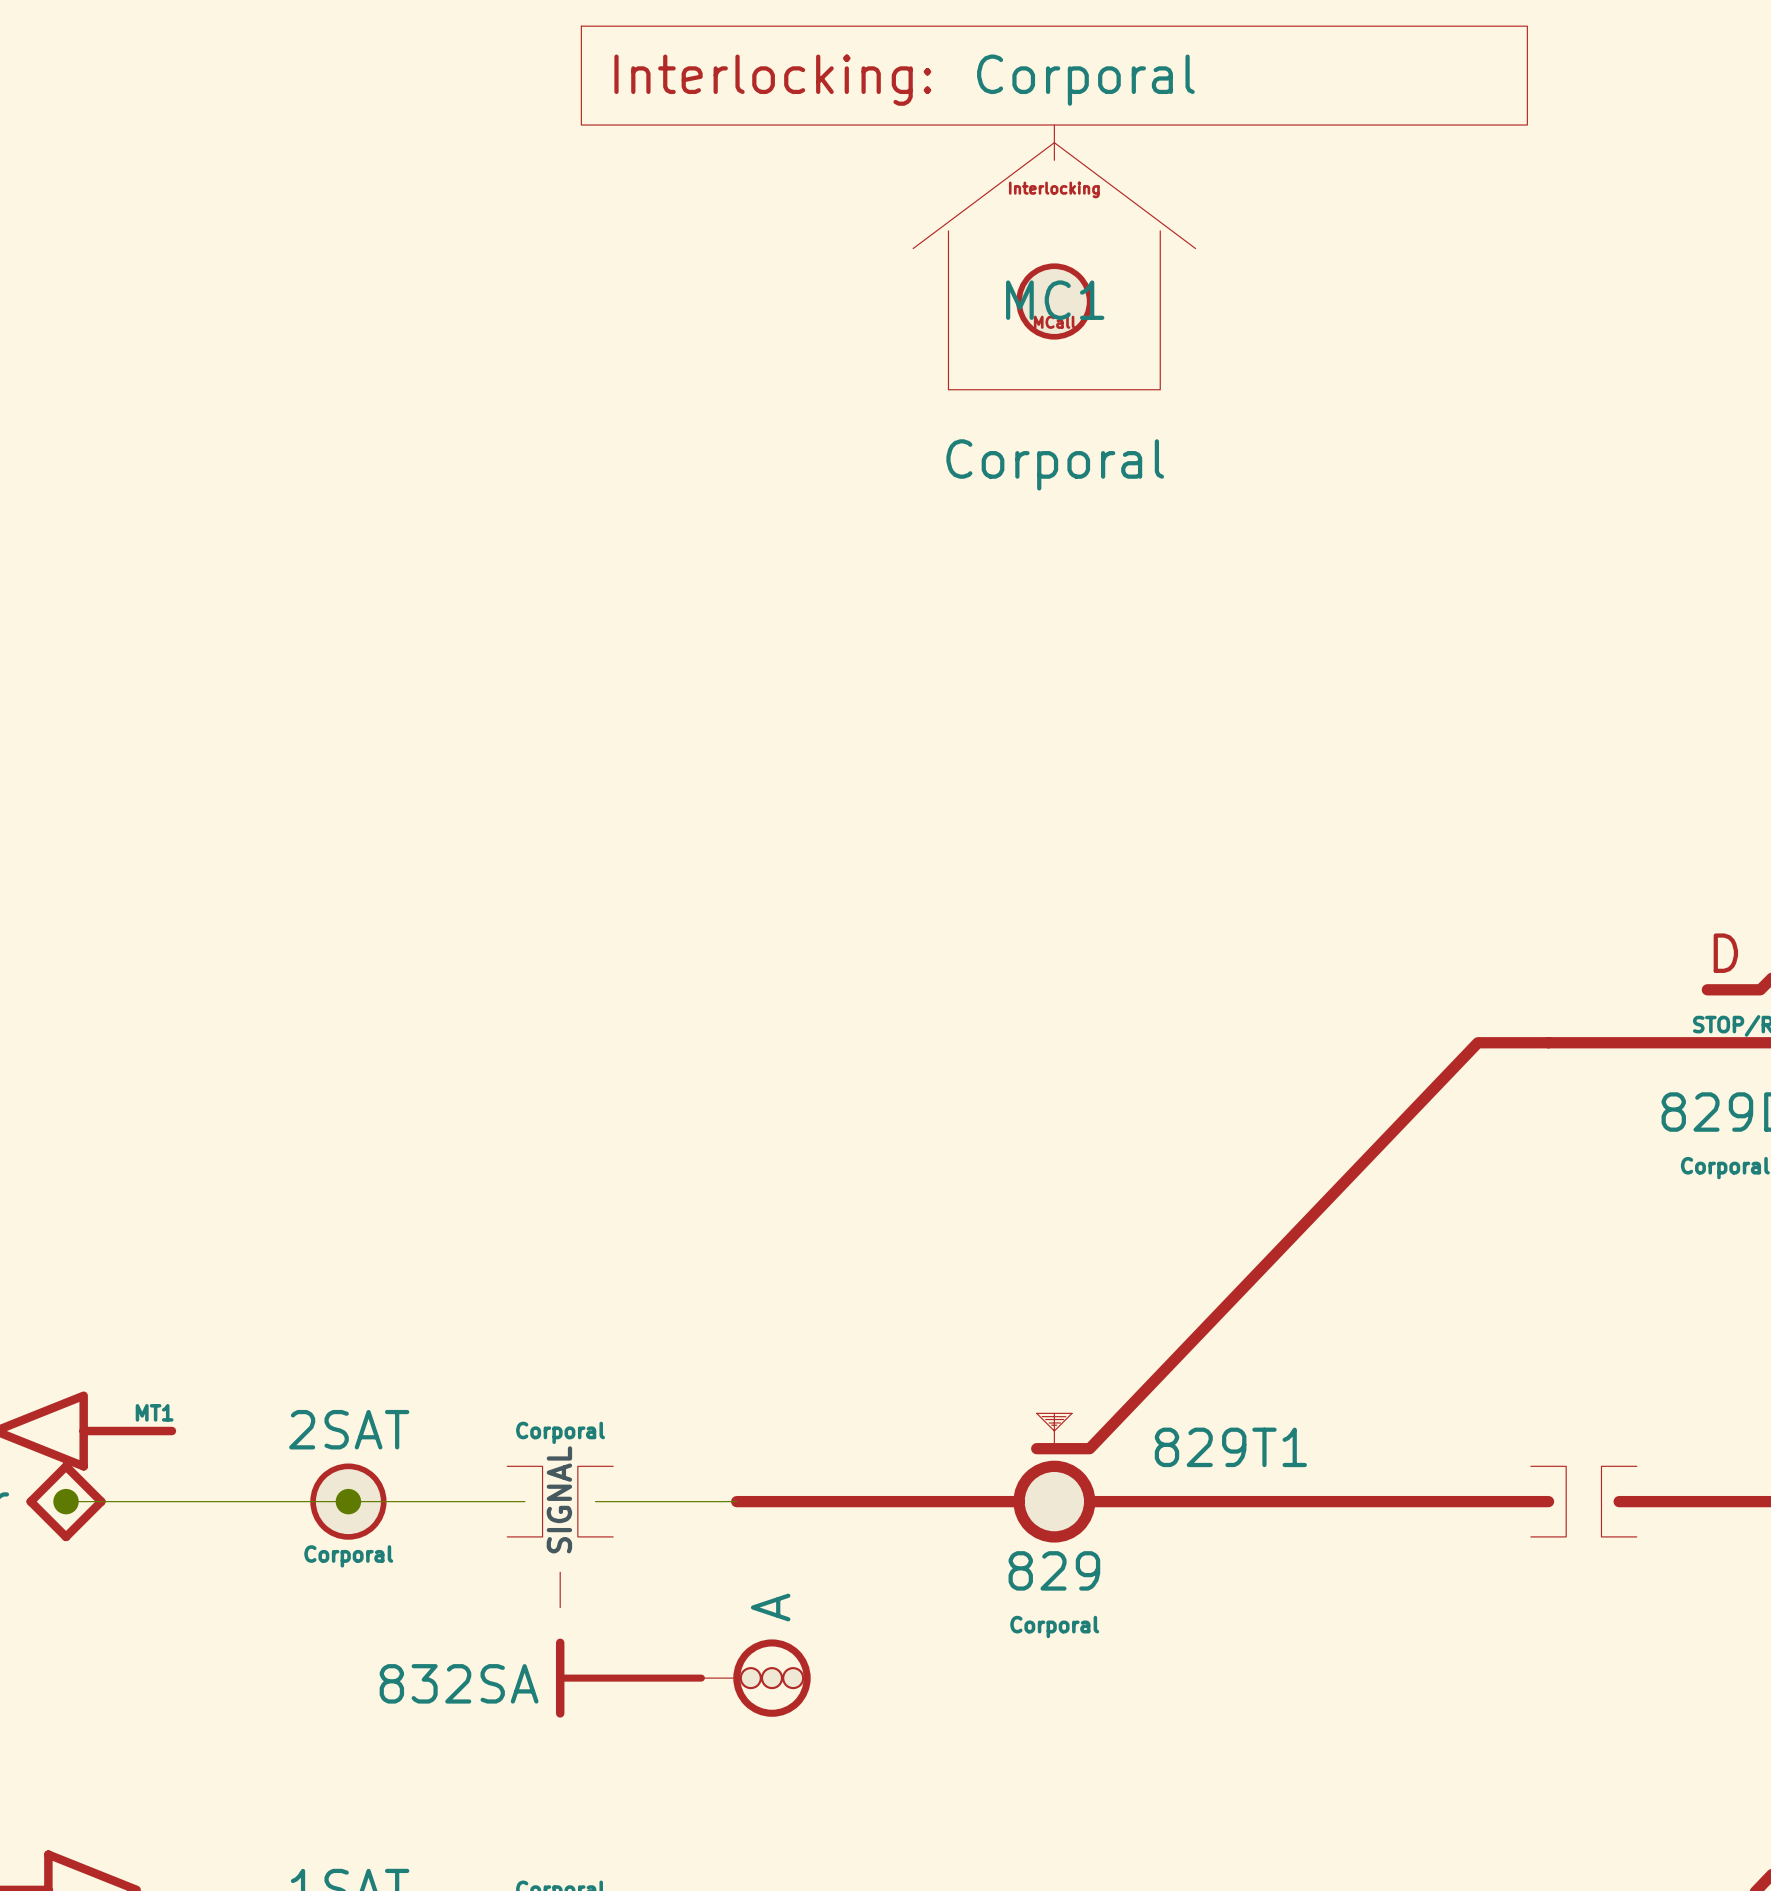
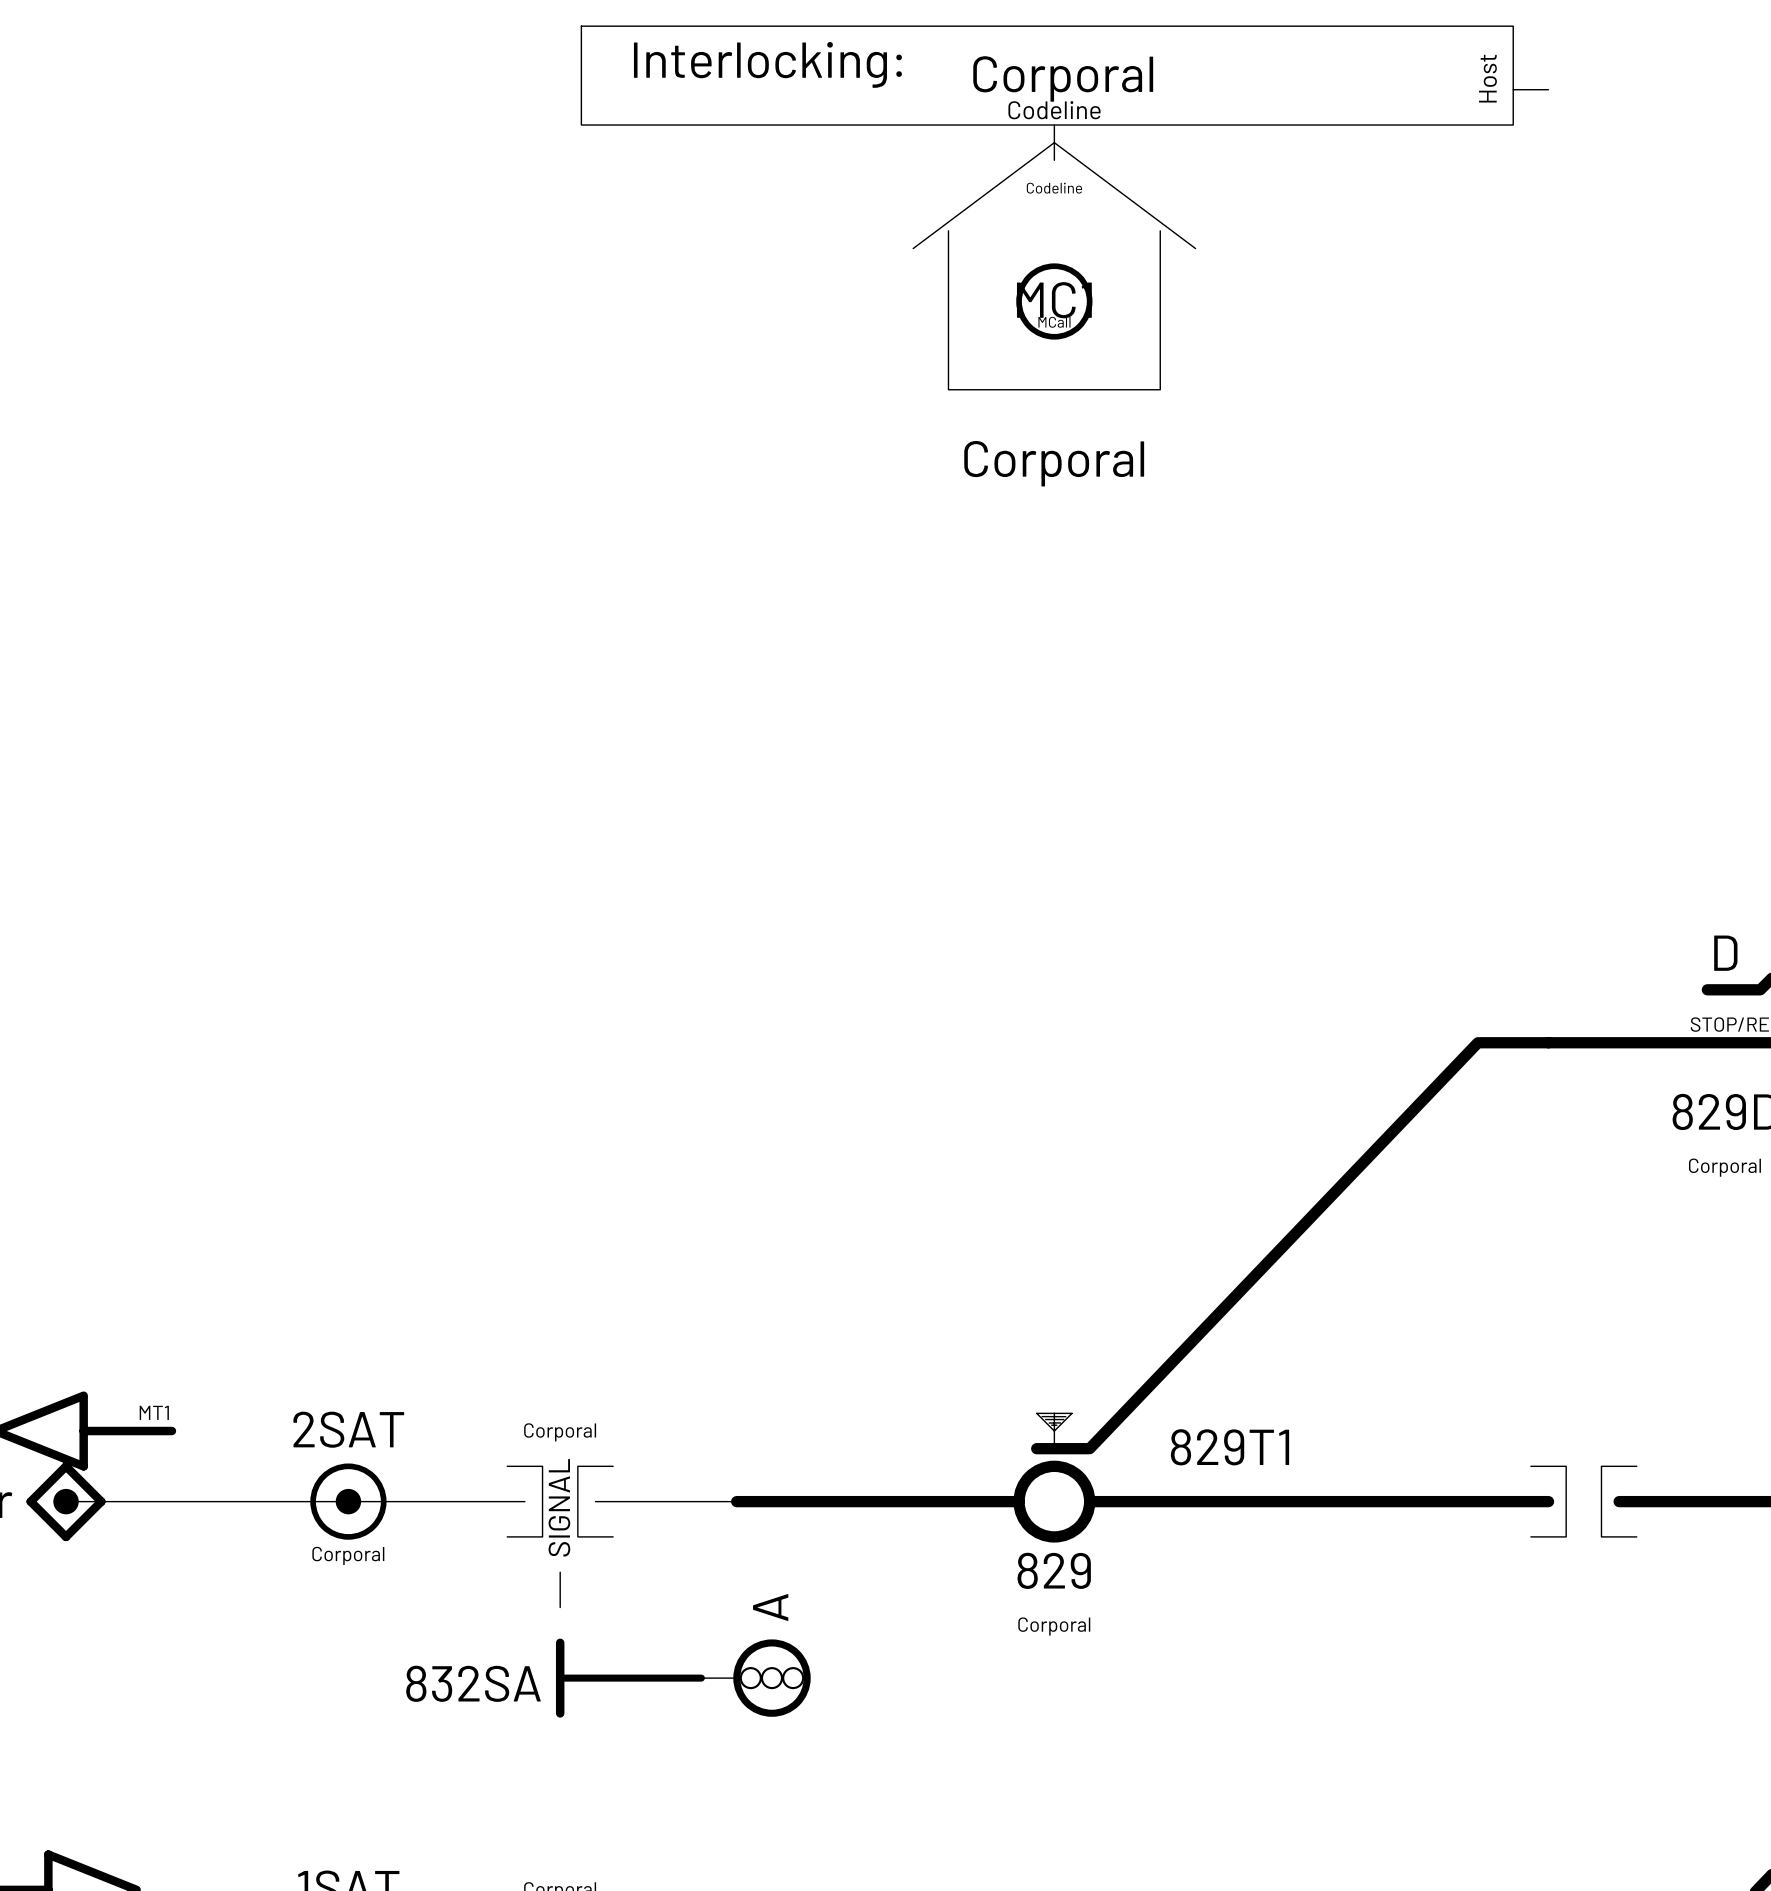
part symbol: [581, 26, 1528, 161] -> [581, 26, 1549, 161]
part text: Interlocking (1054, 189) -> Codeline (1054, 188)

